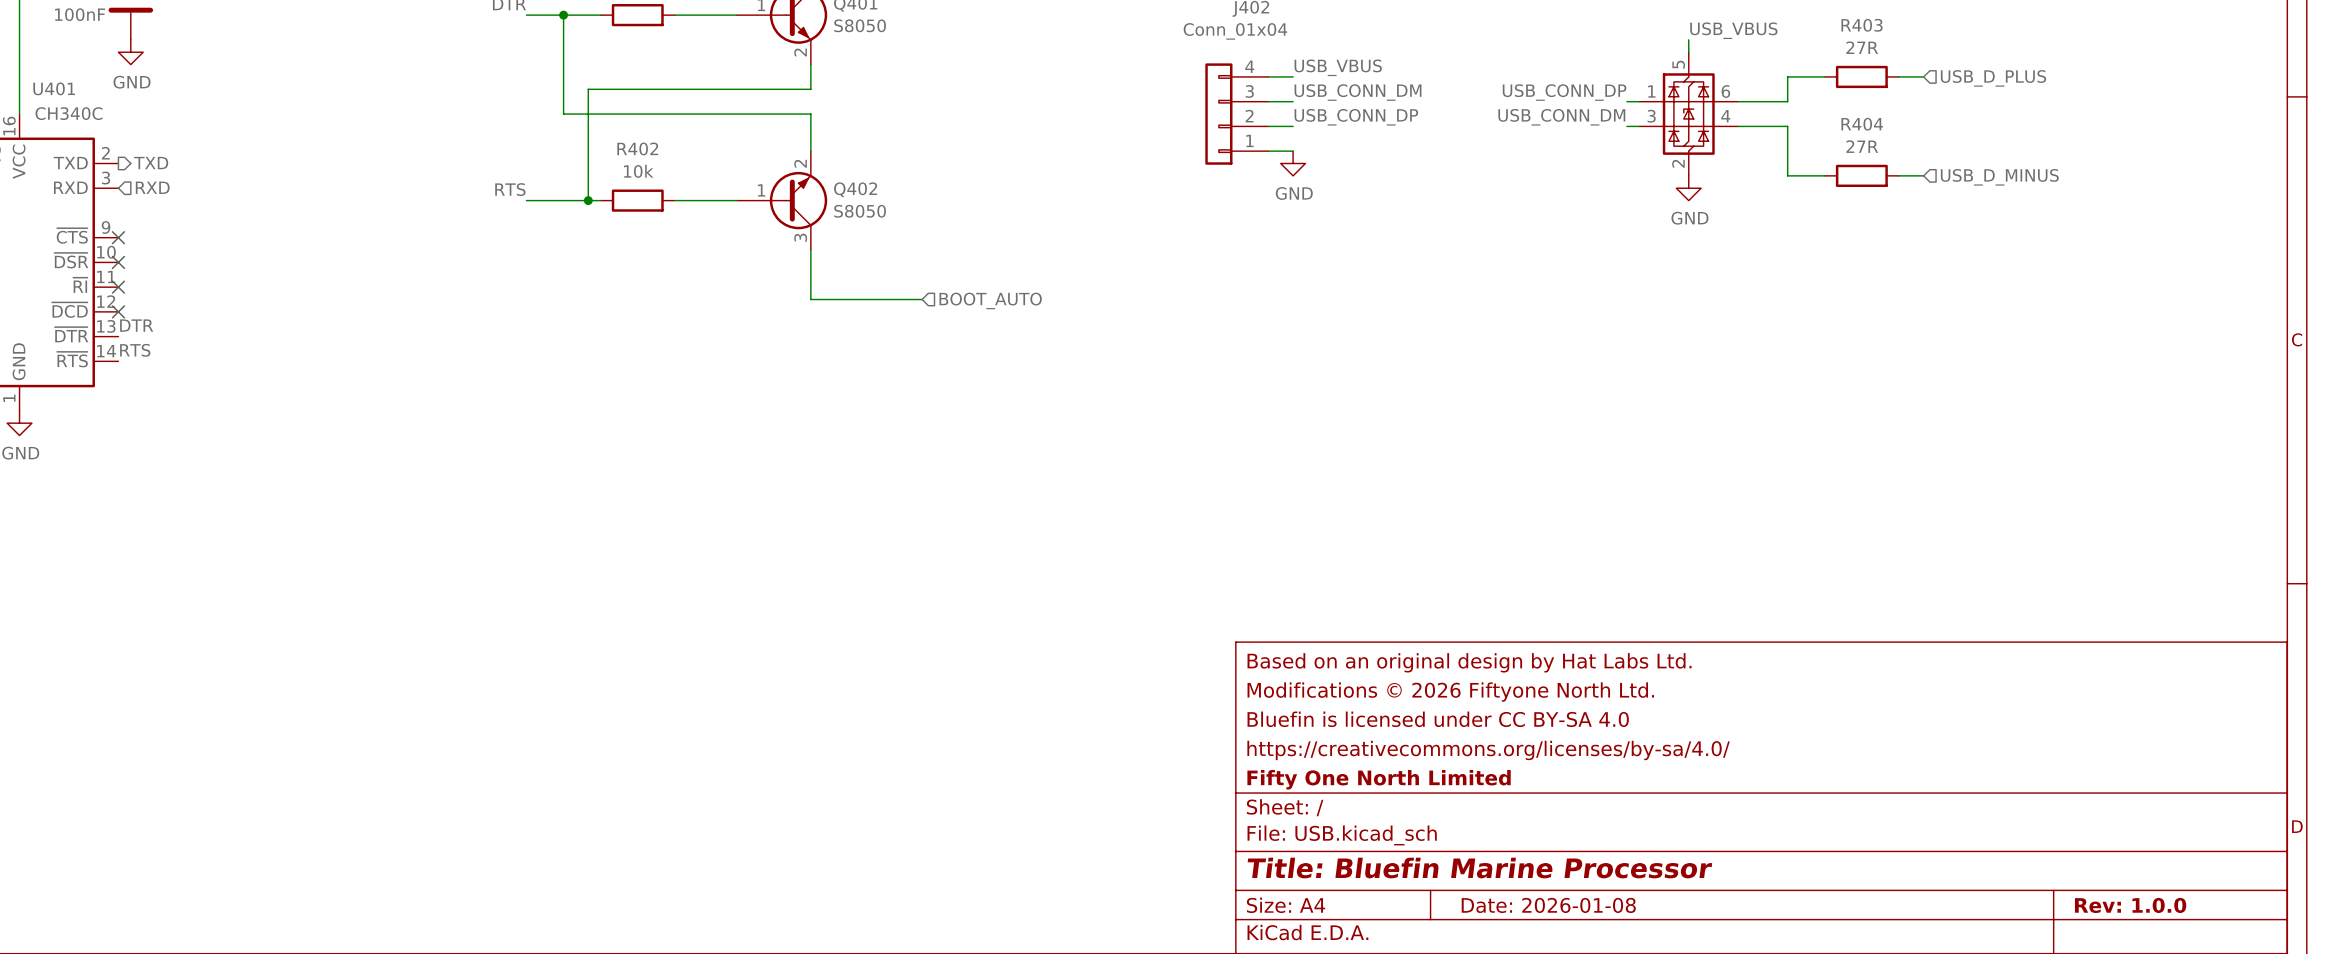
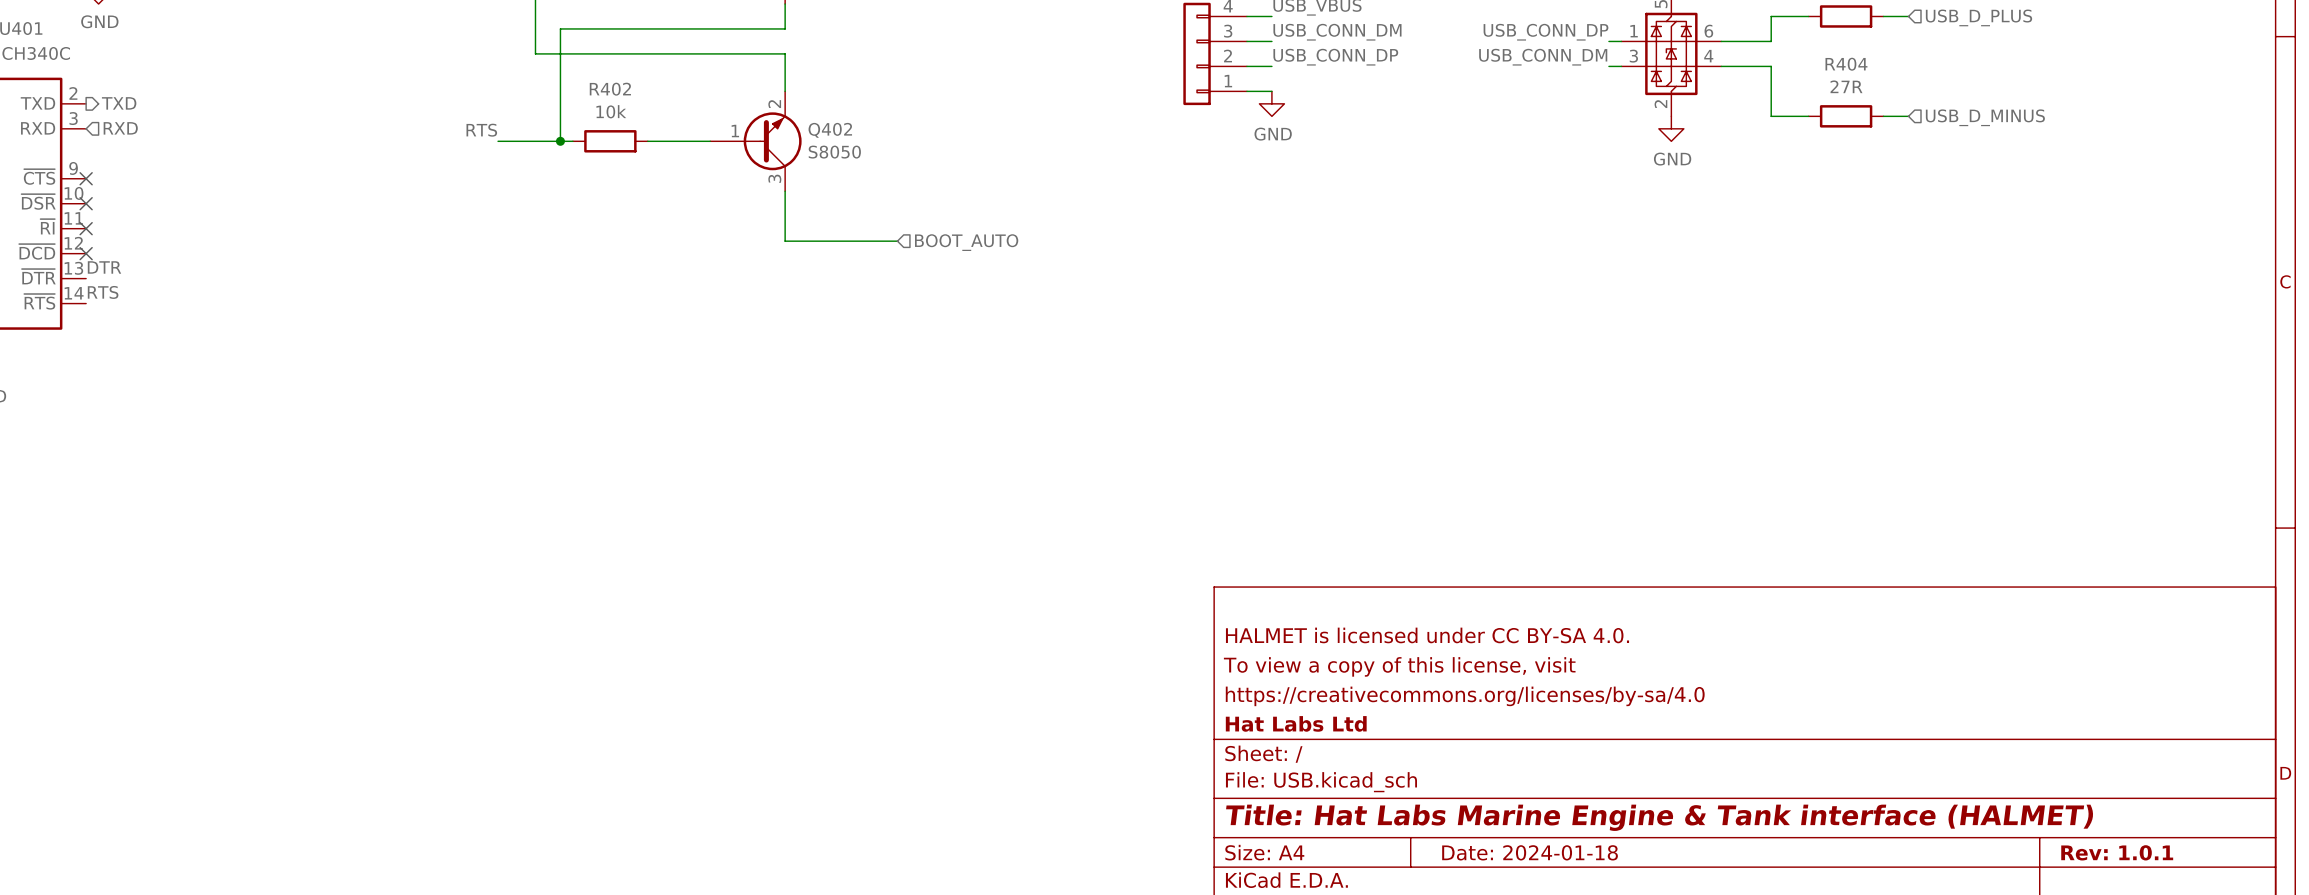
title block: Based on an original design by Hat Labs Ltd. (1469, 662) -> none
title block: Modifications © 2026 Fiftyone North Ltd. (1450, 692) -> HALMET is licensed under CC BY-SA 4.0. (1427, 635)
title block: Bluefin is licensed under CC BY-SA 4.0 (1438, 719) -> To view a copy of this license, visit (1399, 666)
title block: https://creativecommons.org/licenses/by-sa/4.0/ (1488, 750) -> https://creativecommons.org/licenses/by-sa/4.0 (1465, 696)
title block: Fifty One North Limited (1379, 779) -> Hat Labs Ltd (1296, 723)
title block: Title: Bluefin Marine Processor (1479, 868) -> Title: Hat Labs Marine Engine & Tank interface (HALMET) (1659, 817)
title block: Date: 2026-01-08 (1548, 905) -> Date: 2024-01-18 (1530, 852)
title block: Rev: 1.0.0 (2130, 905) -> Rev: 1.0.1 (2117, 852)

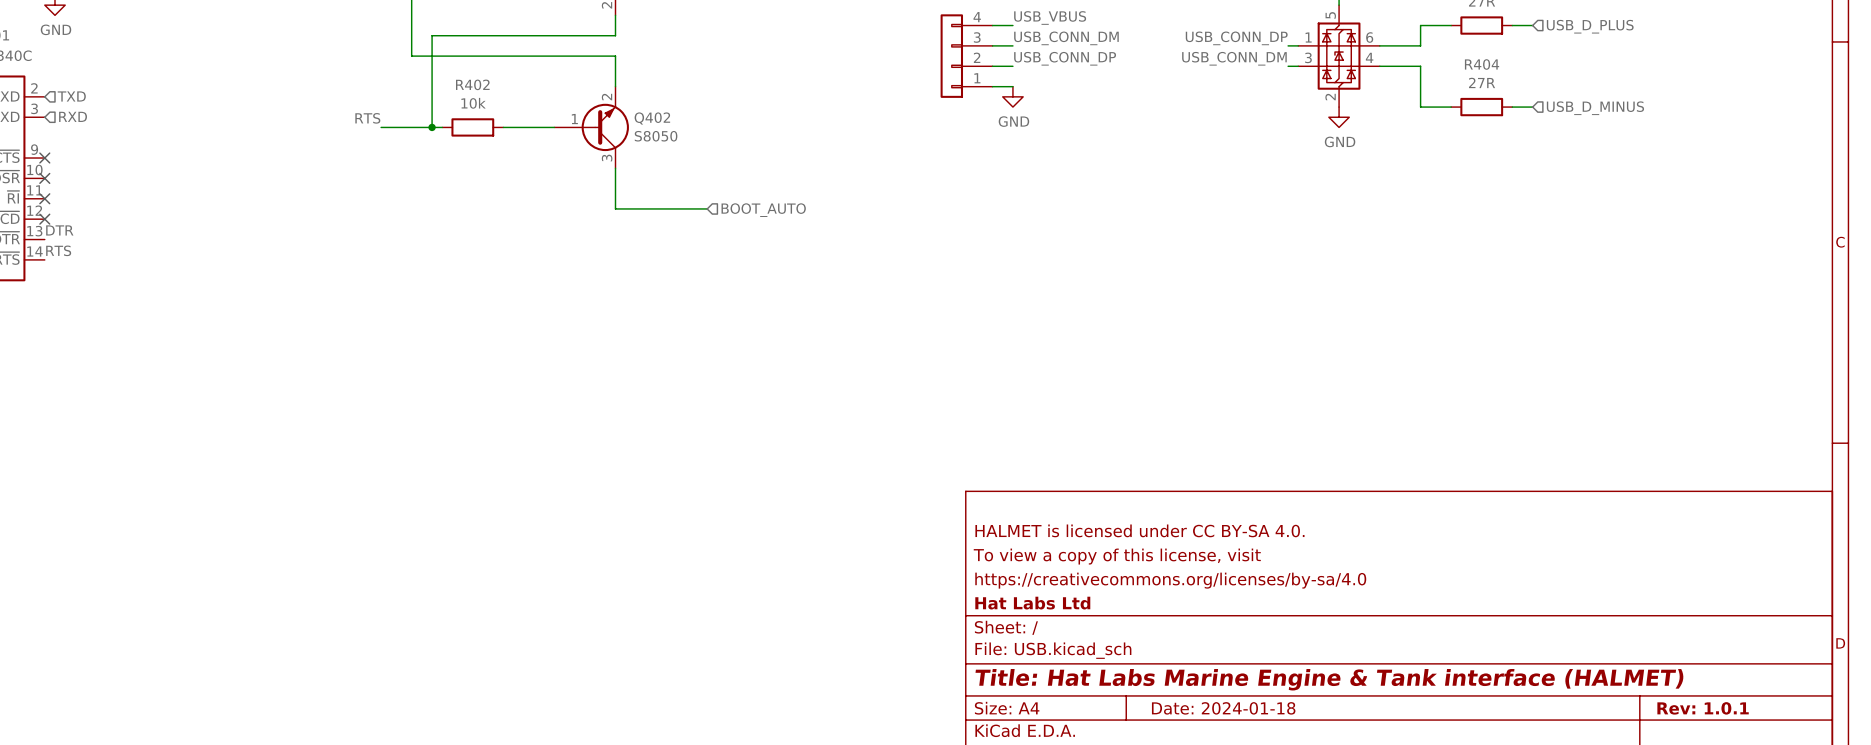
hierarchical label shape: output (119, 103) -> input (71, 96)

